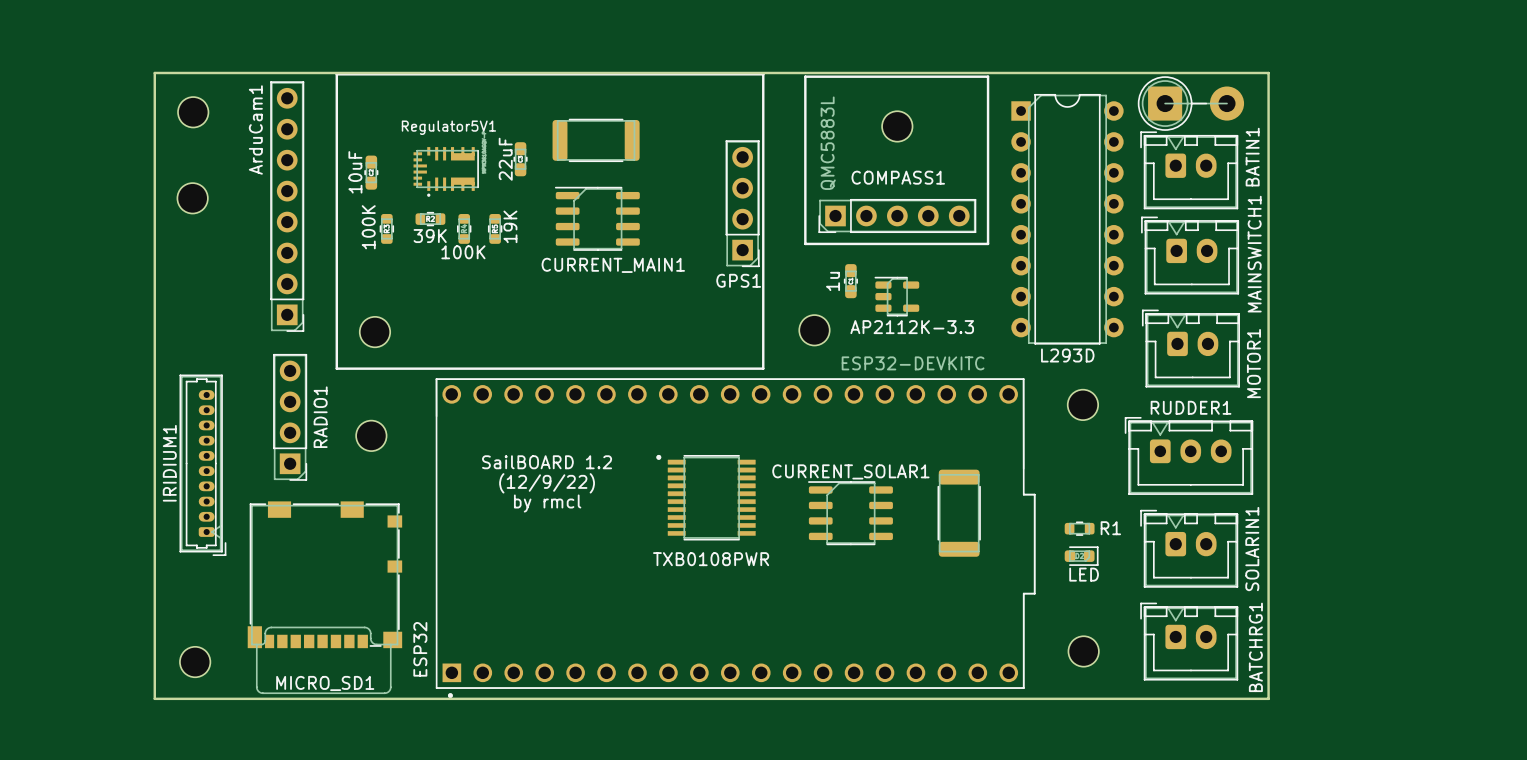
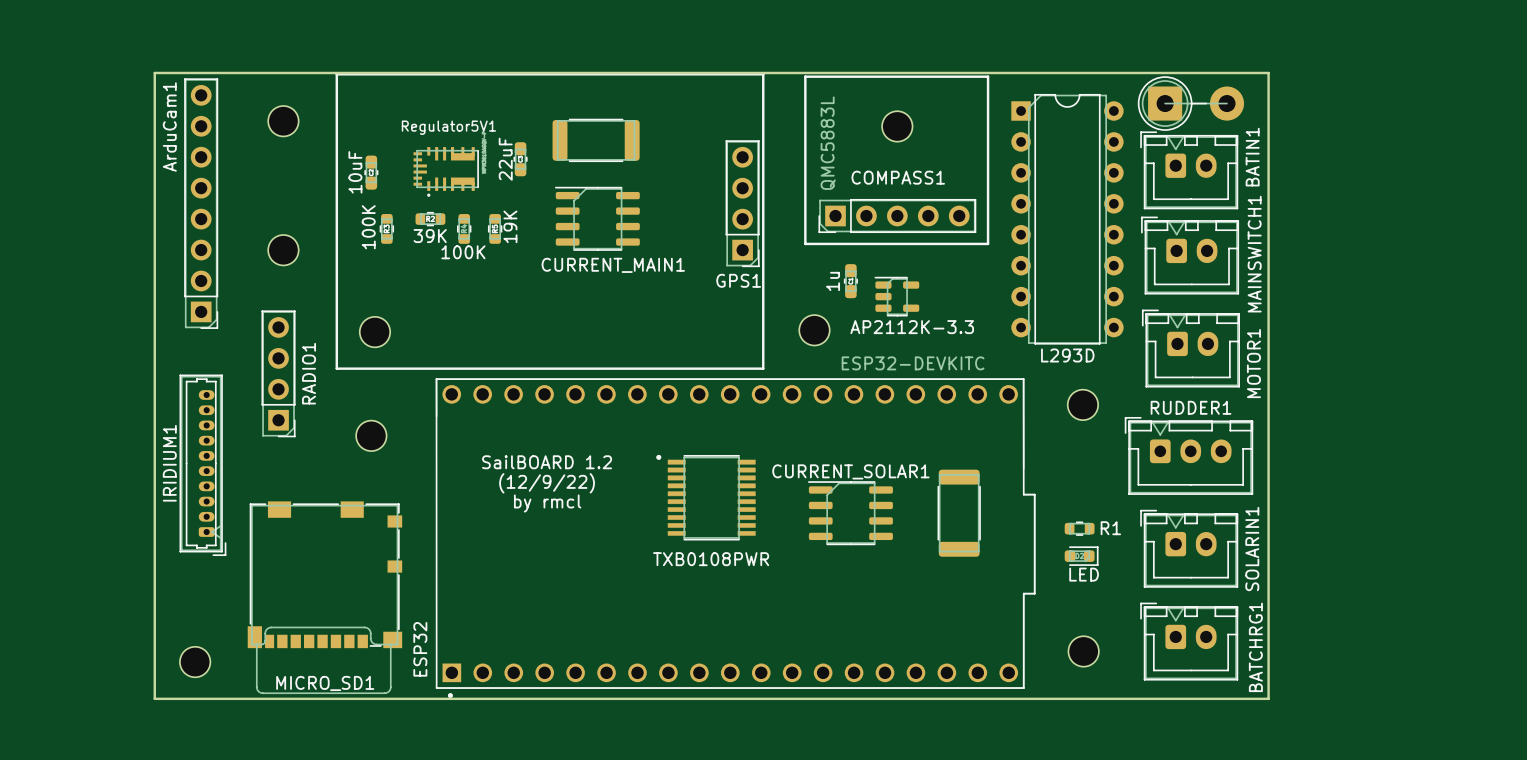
part: (193, 112) -> none
part: none -> (283, 121)
part: (192, 198) -> none
ArduCam1 position: (287, 206) -> (201, 203)
part: none -> (283, 250)
RADIO1 position: (290, 417) -> (278, 373)

